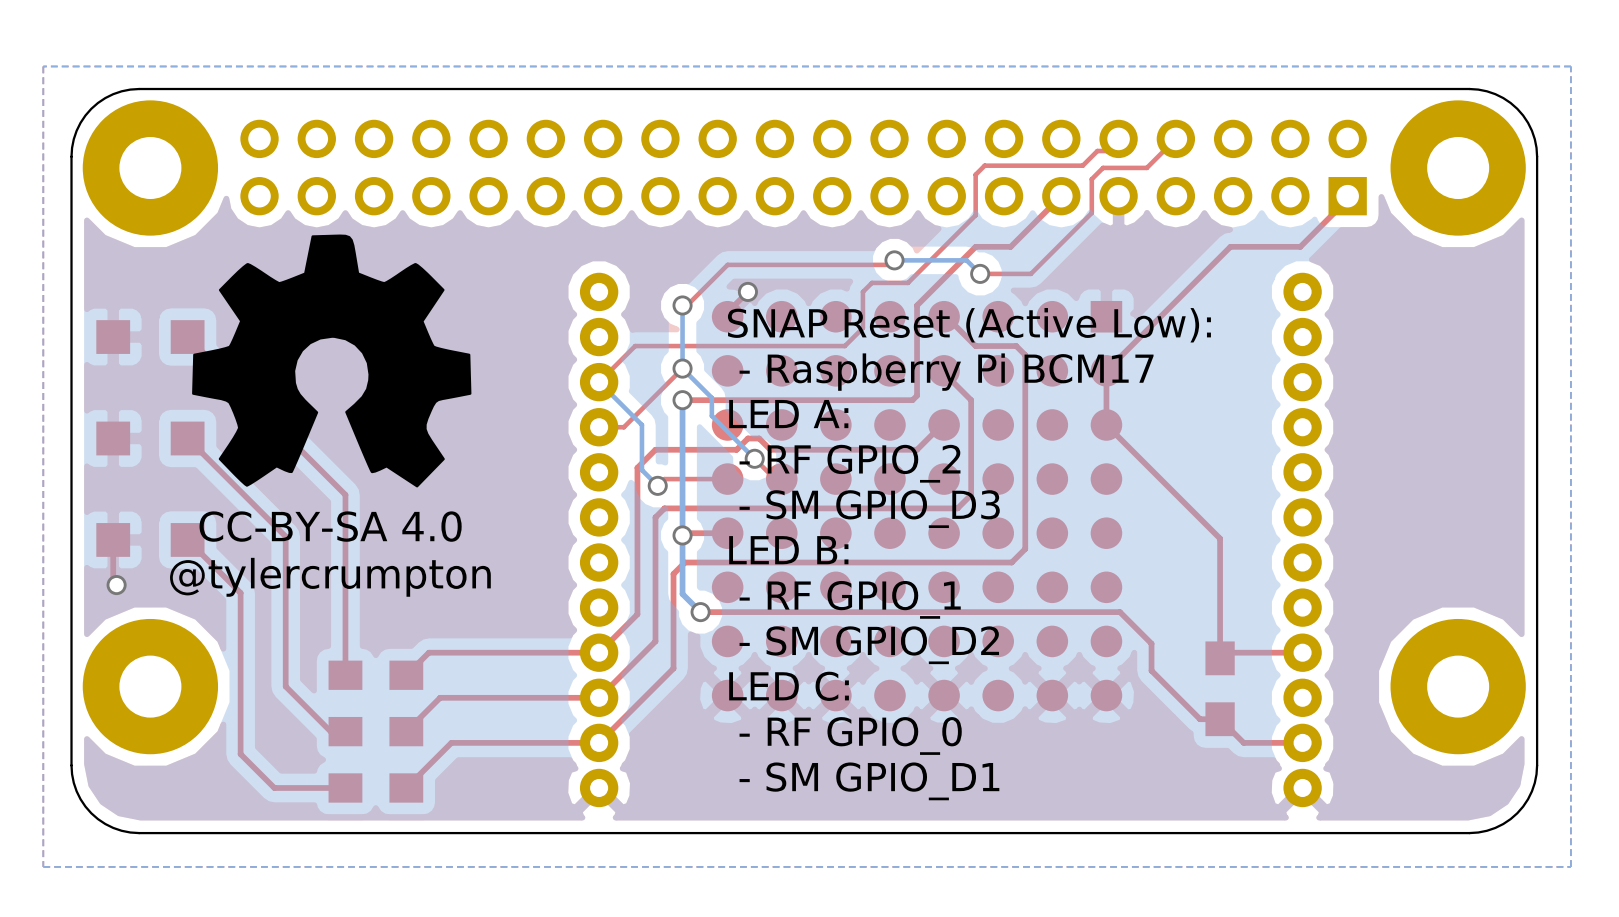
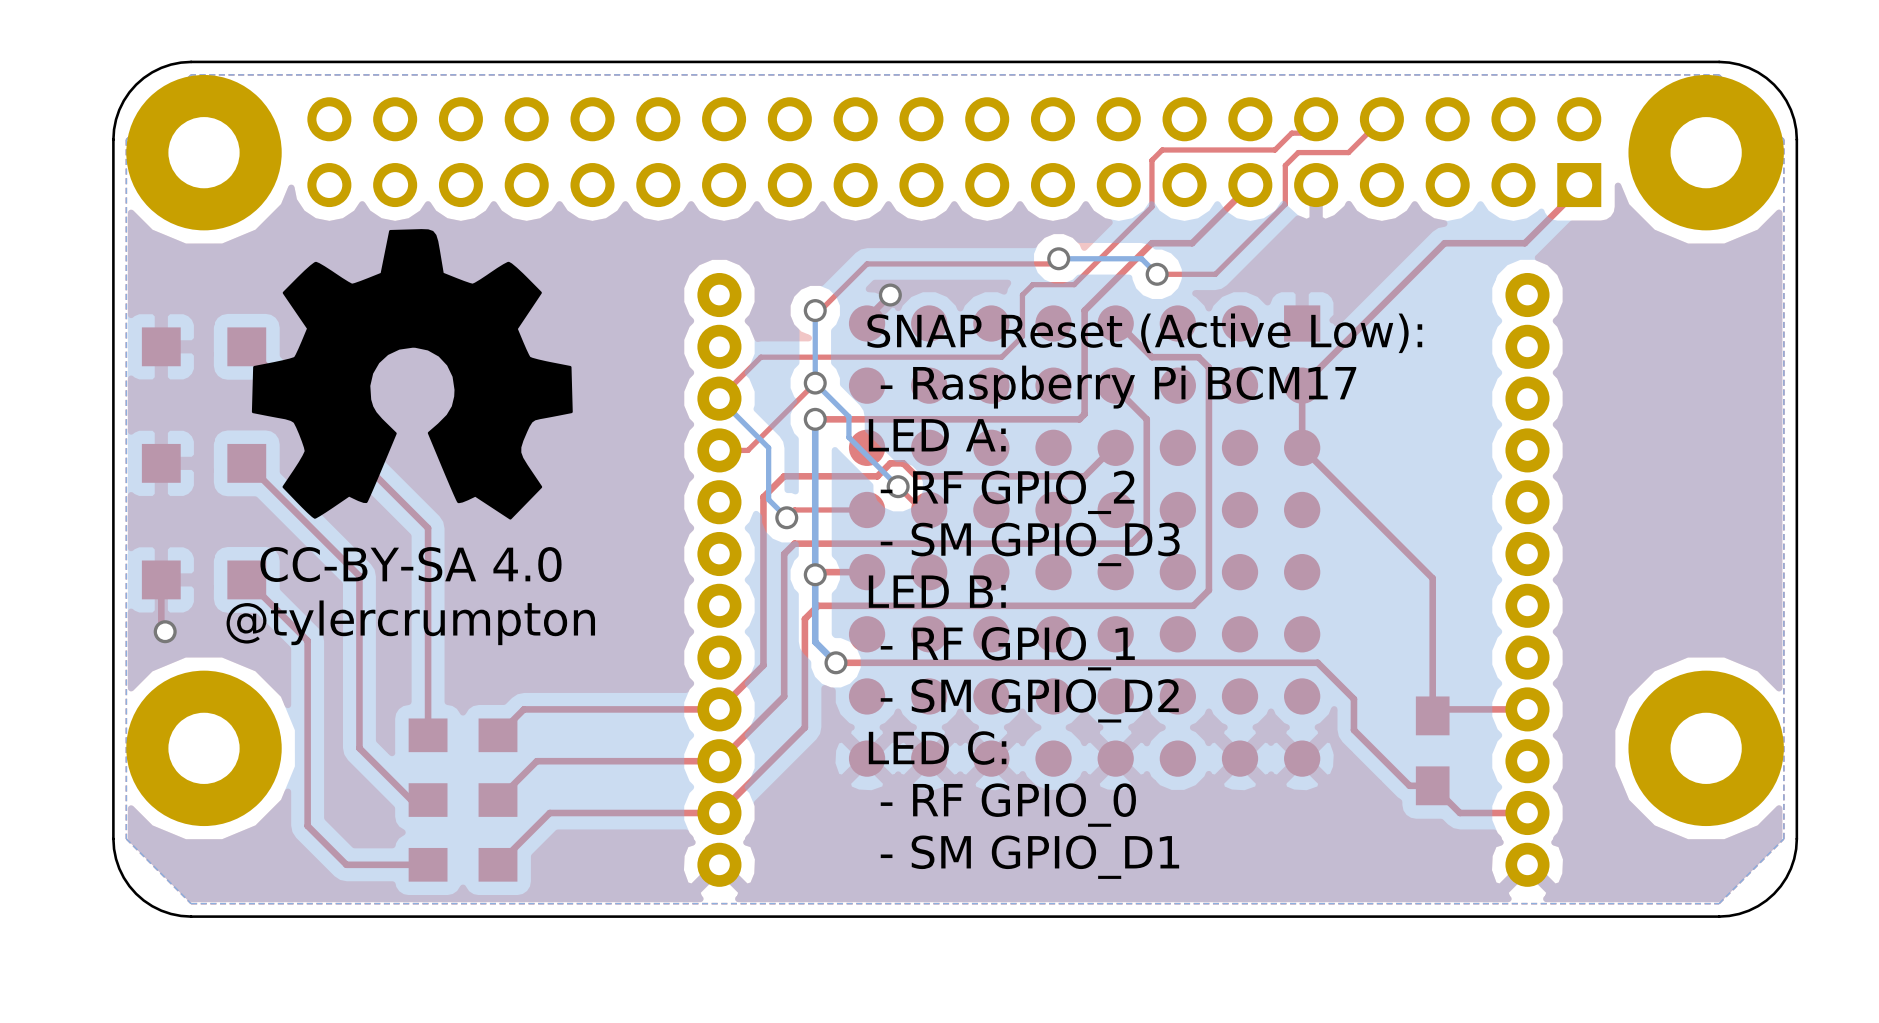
bottom zone outline: (1570, 66) (1570, 866) (43, 866) (43, 66) (1570, 66) -> (1719, 74) (1783, 139) (1783, 838) (1719, 903) (191, 903) (126, 838) (126, 139) (191, 74) (1719, 74)

